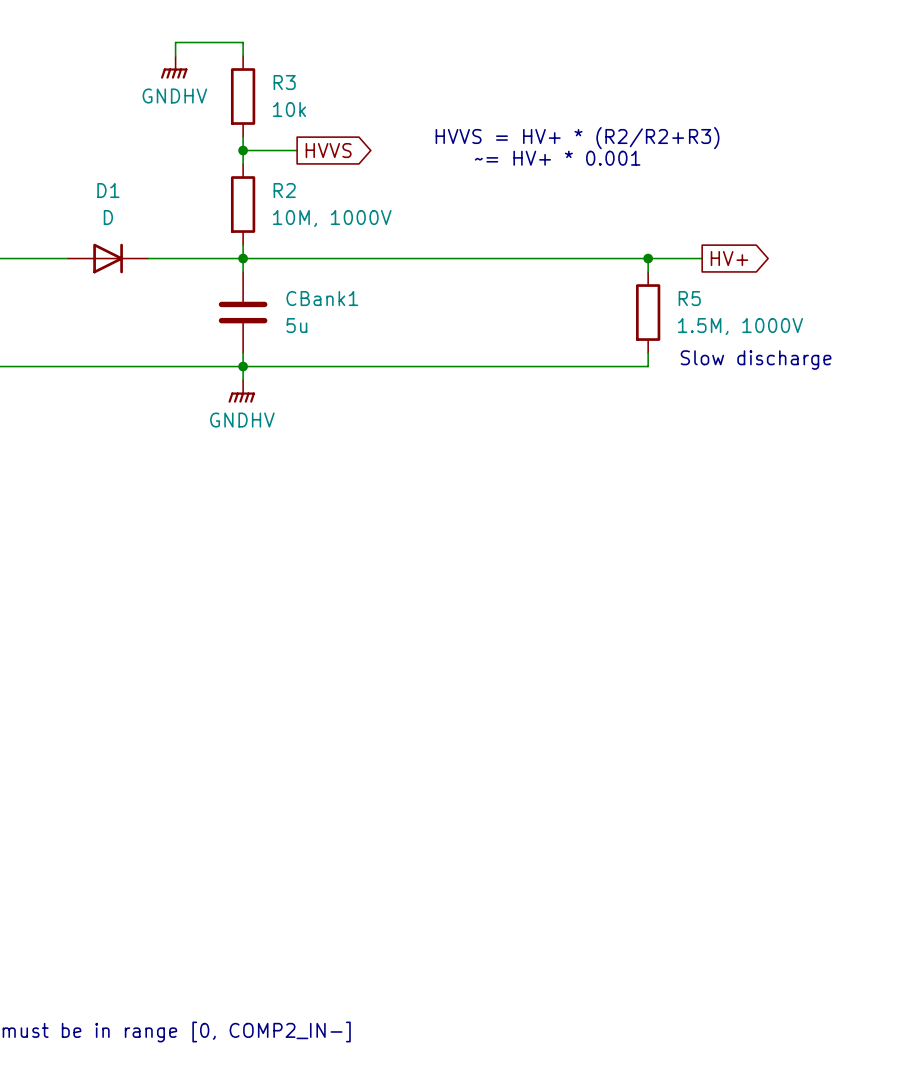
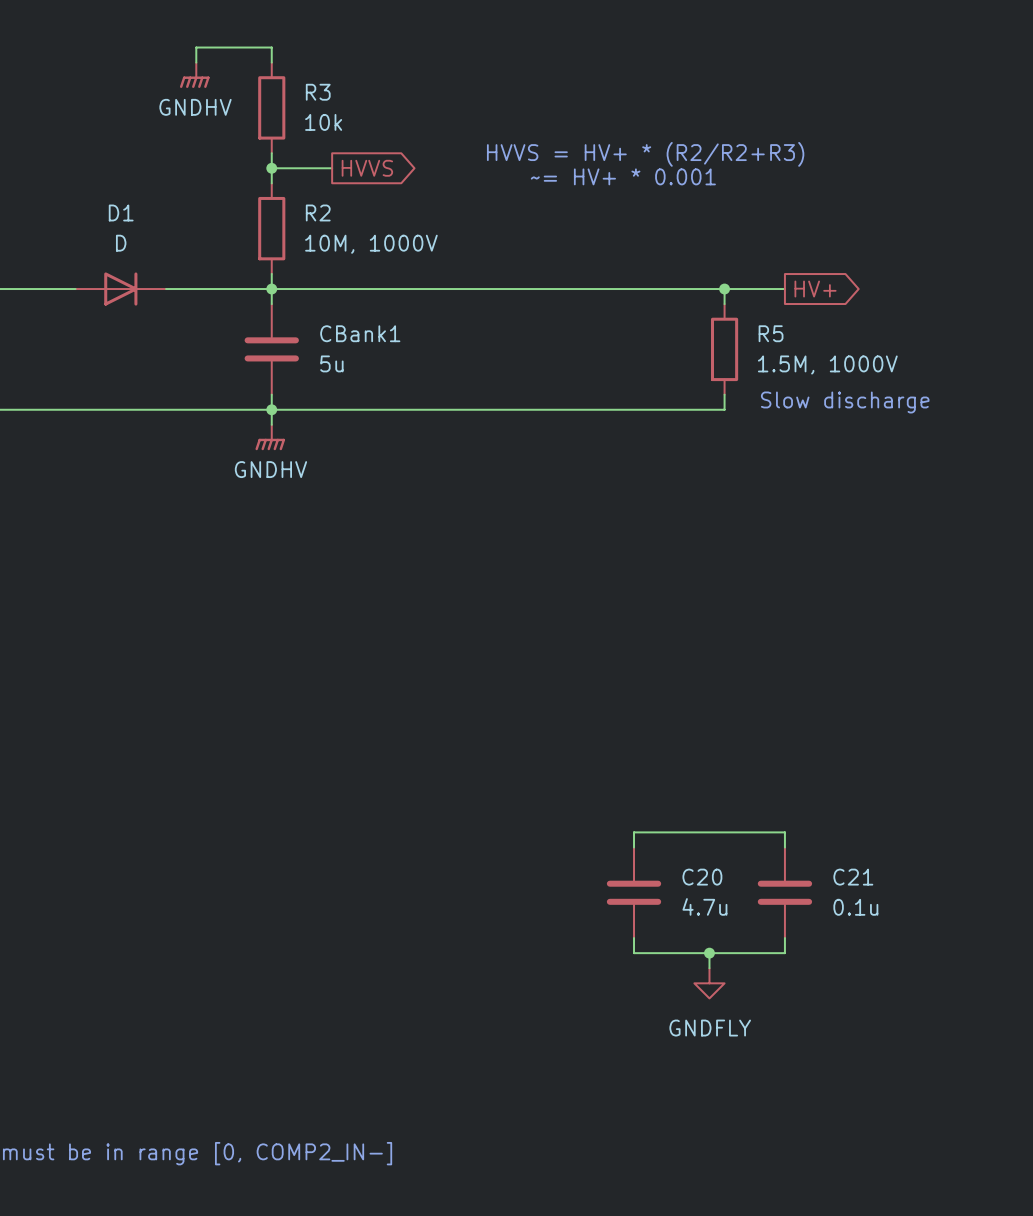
wire: none -> (634, 847) (634, 832) (784, 832) (784, 847)
C20: none -> 4.7u (634, 892)
C21: none -> 0.1u (784, 892)
wire: none -> (634, 938) (634, 953) (784, 953) (784, 938)
wire: none -> (709, 953) (709, 968)
junction: none -> (709, 953)
power symbol: none -> GNDFLY (709, 983)

